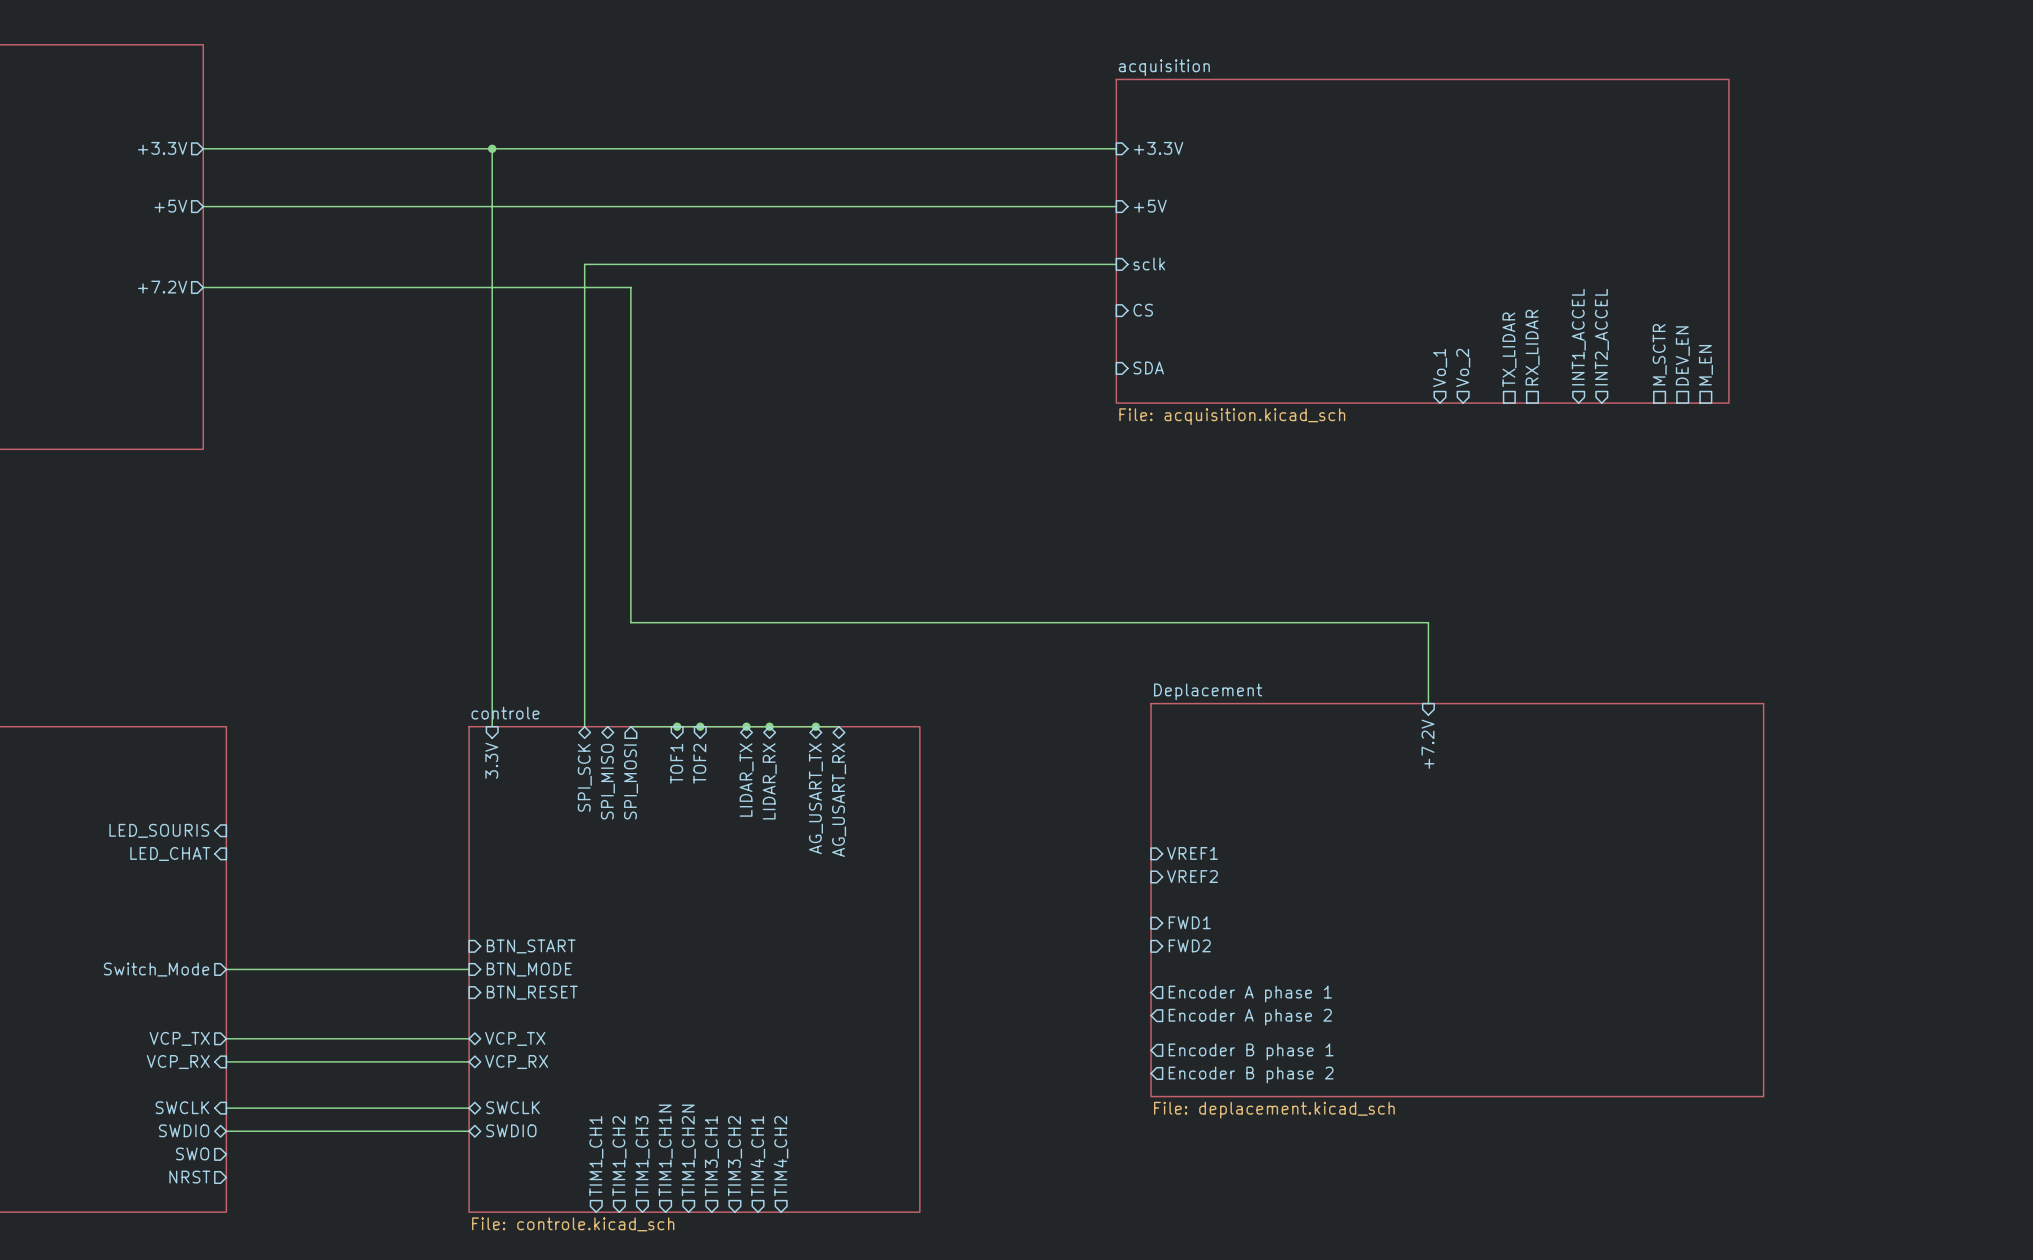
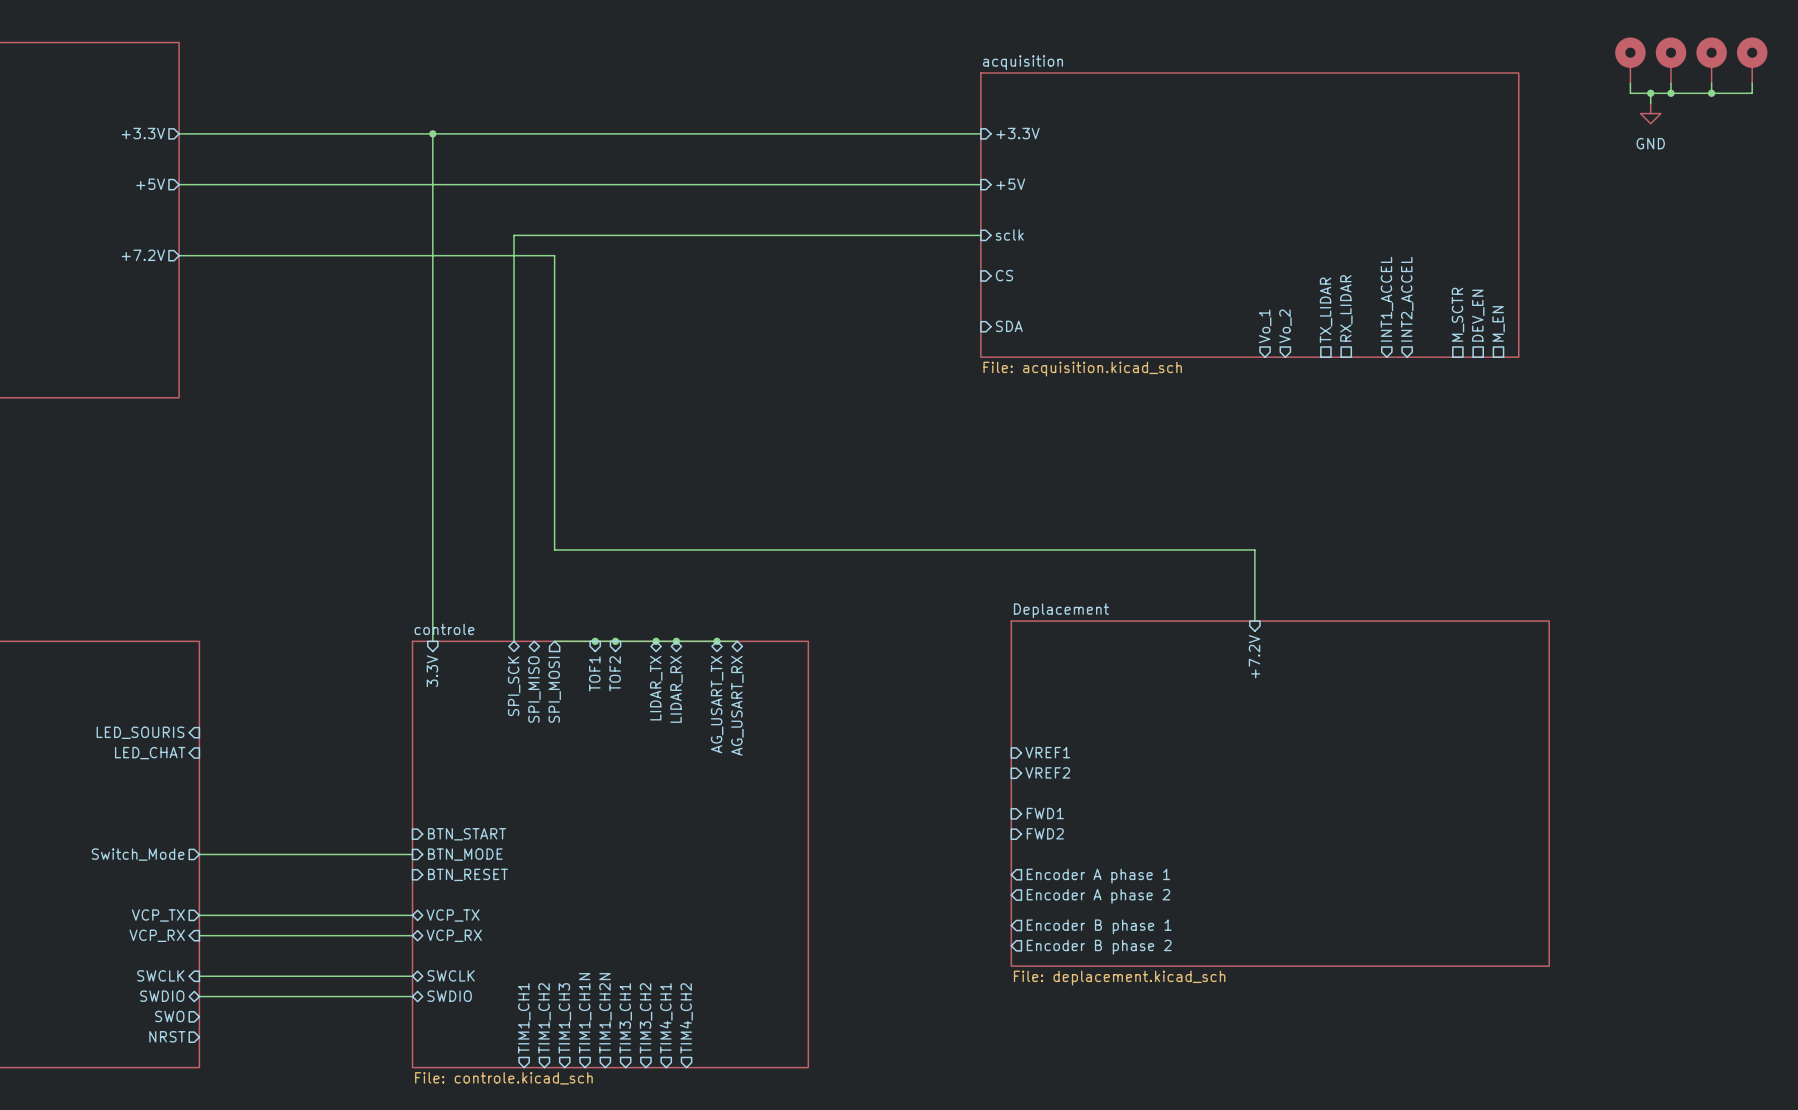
part: none -> (1630, 60)
part: none -> (1671, 60)
part: none -> (1711, 60)
part: none -> (1752, 60)
wire: none -> (1630, 83) (1630, 93) (1752, 93) (1752, 83)
wire: none -> (1671, 83) (1671, 93)
wire: none -> (1711, 83) (1711, 93)
wire: none -> (1650, 93) (1650, 103)
junction: none -> (1650, 93)
junction: none -> (1671, 93)
junction: none -> (1711, 93)
power symbol: none -> GND (1650, 113)

